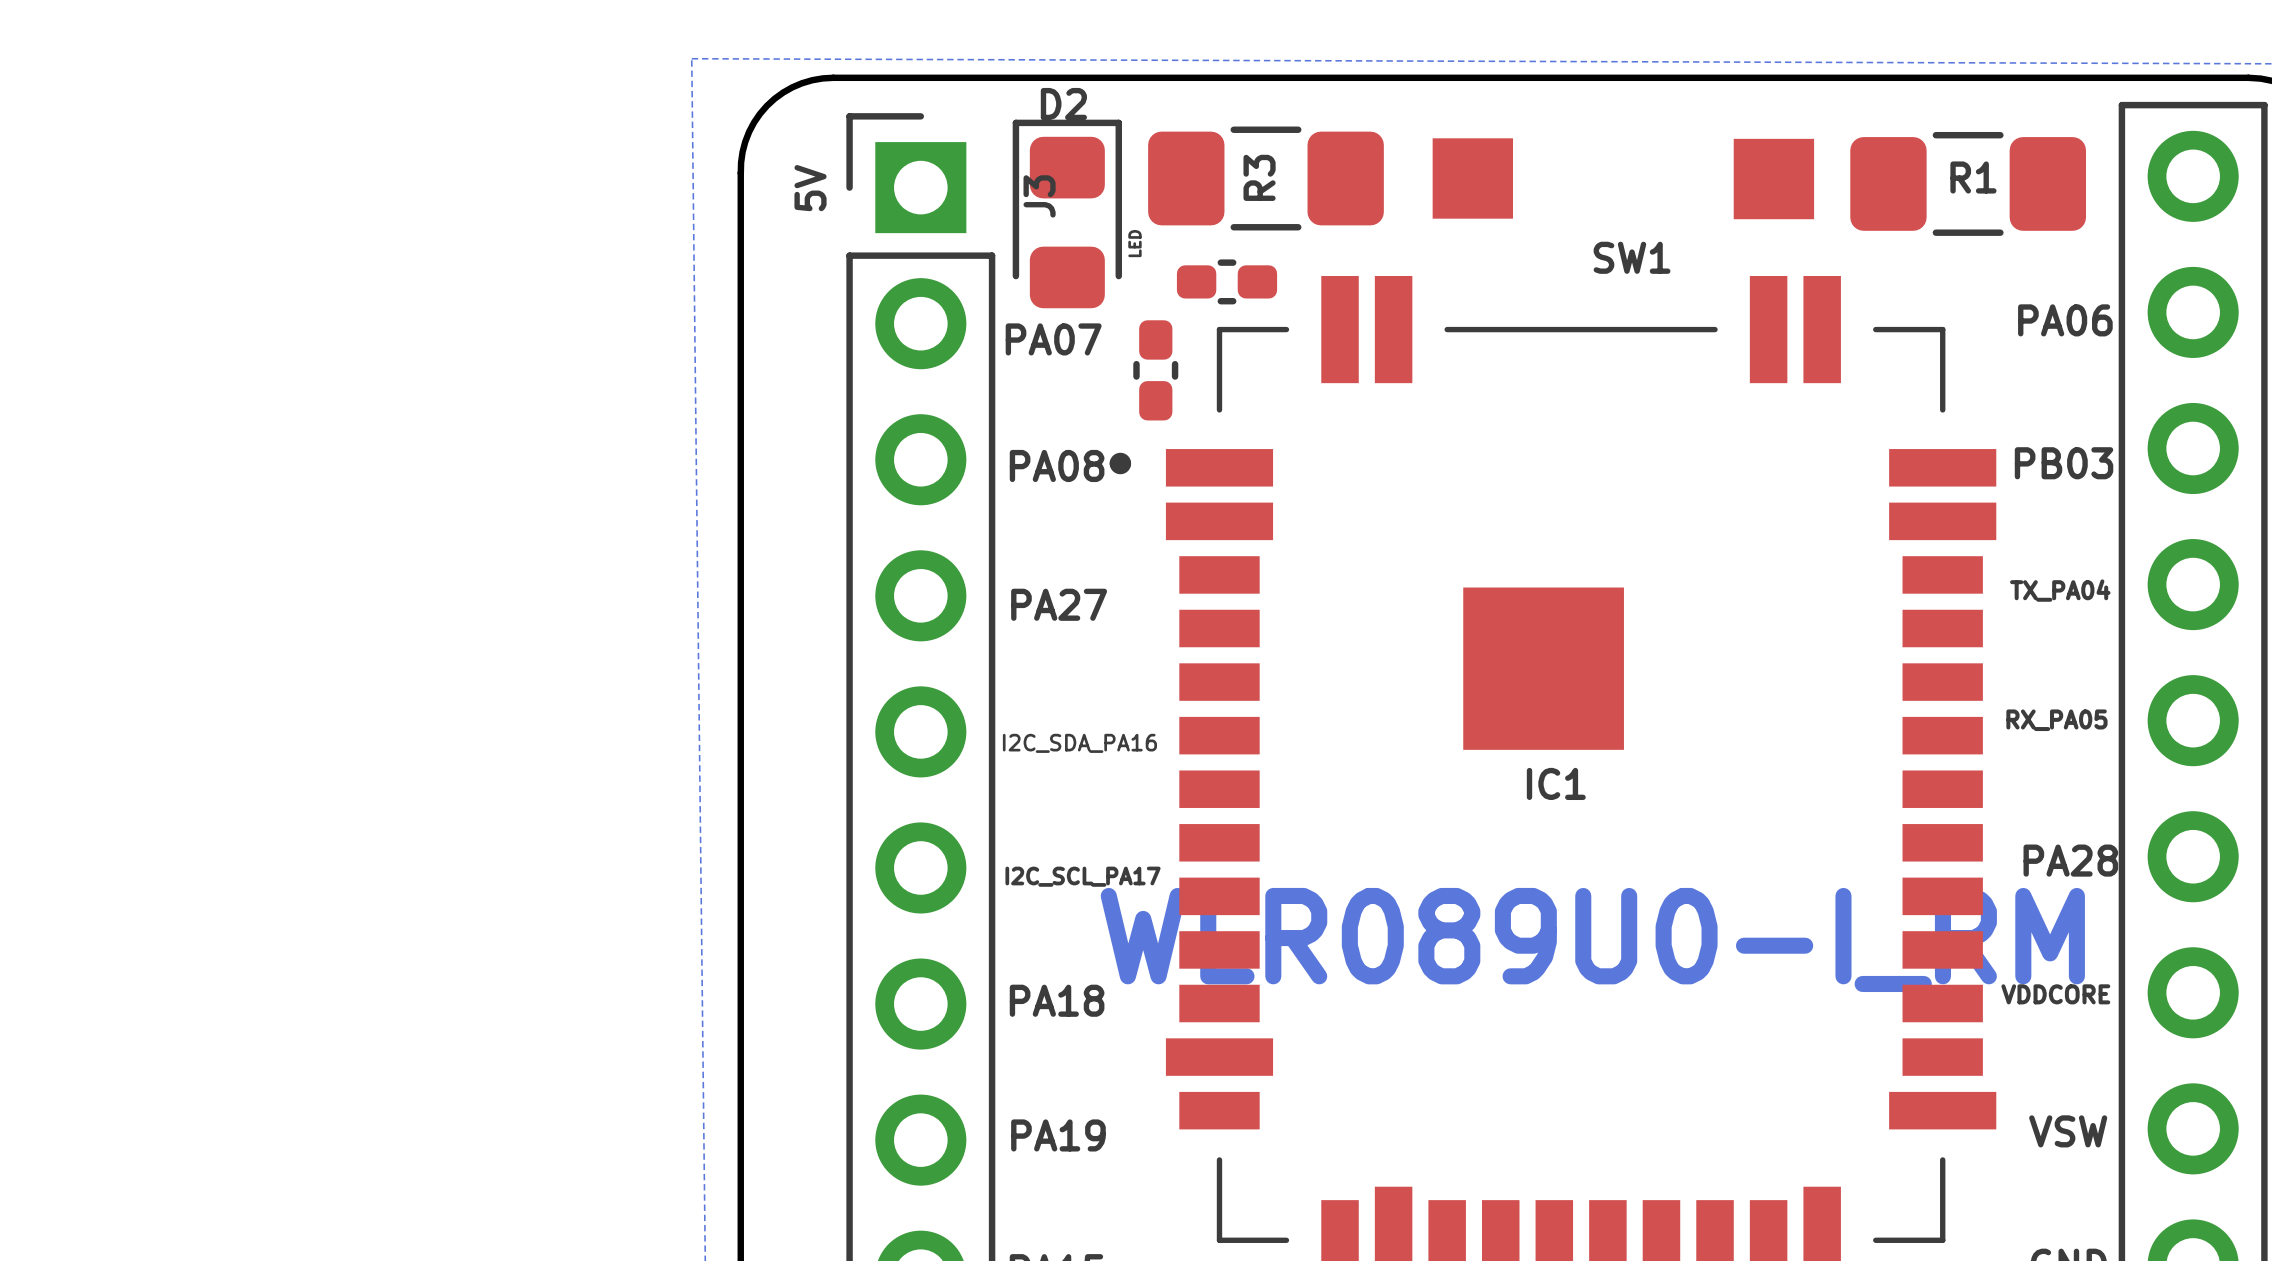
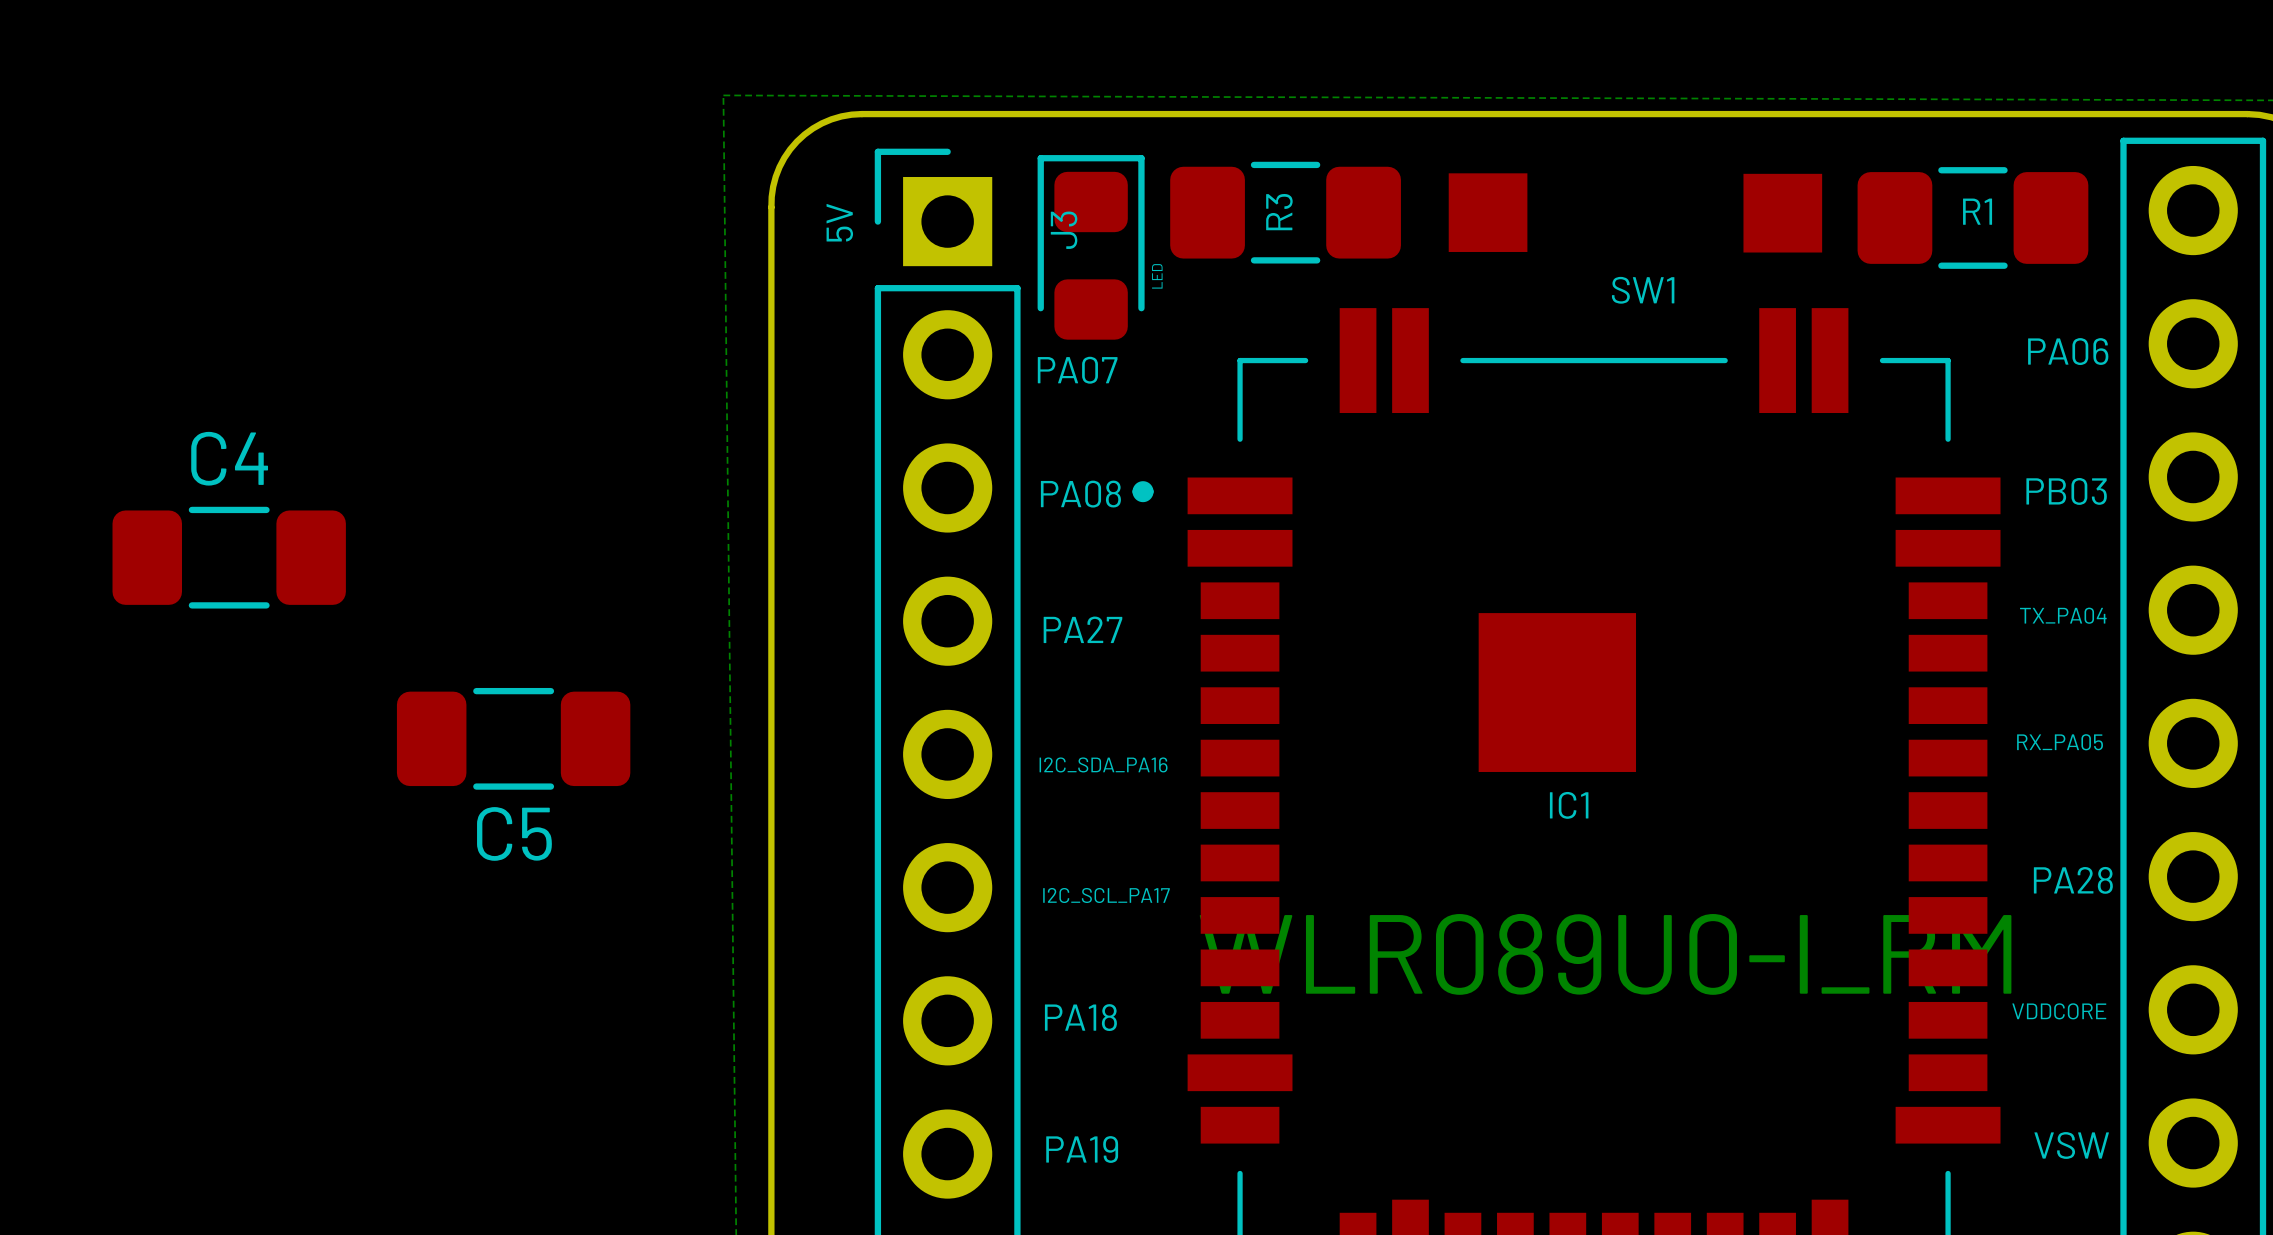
D2 name: D2 (1063, 104) -> none
part: (1227, 281) -> none
part: (1155, 370) -> none
C4: none -> (229, 557)
C5: none -> (513, 738)

